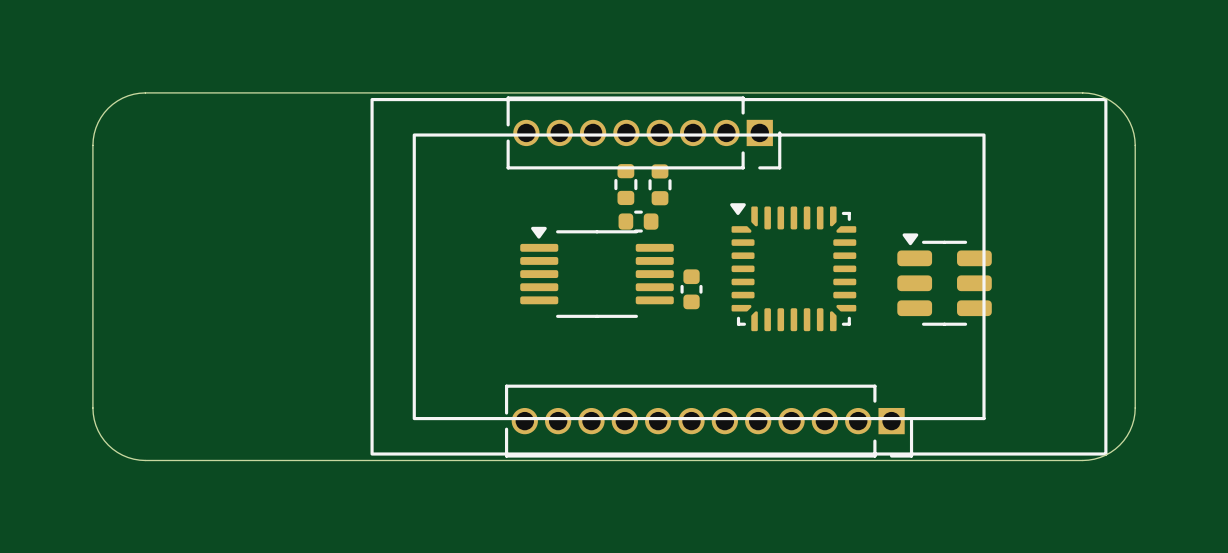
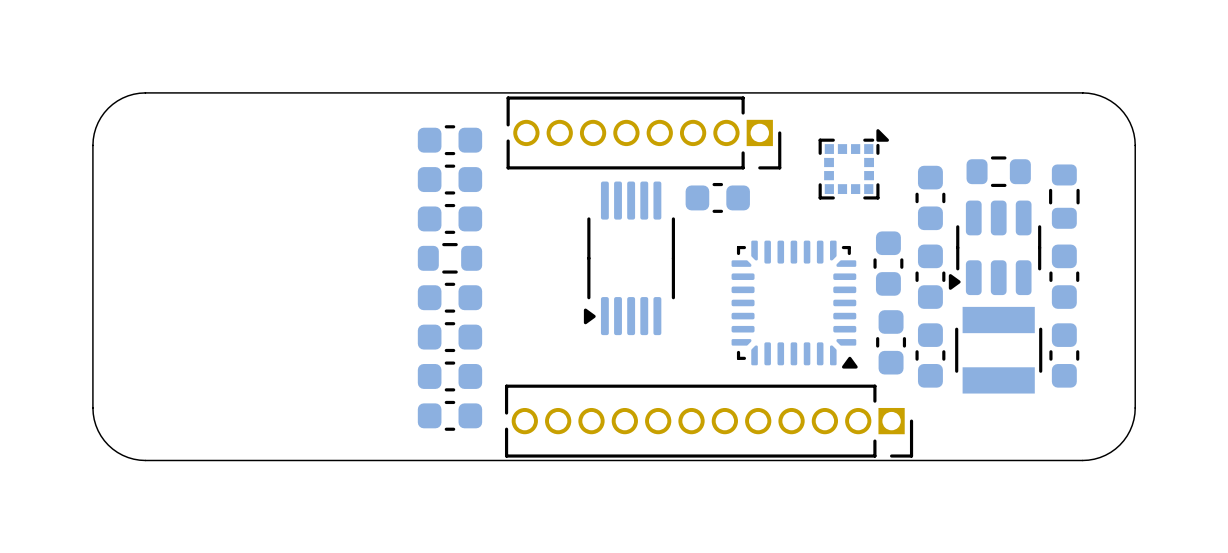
part: none -> (449, 140)
part: none -> (853, 164)
part: none -> (998, 171)
part: none -> (449, 179)
part: (625, 184) -> none
part: (660, 184) -> none
part: none -> (1064, 196)
part: none -> (717, 197)
part: none -> (930, 197)
part: none -> (449, 218)
part: (638, 221) -> none
part footprint: [897, 233, 992, 326] -> [915, 244, 946, 309]
part: none -> (995, 247)
part: none -> (449, 258)
part: none -> (888, 263)
part rotation: 0° (793, 267) -> 180° (794, 304)
part rotation: 0° (597, 272) -> 90° counterclockwise (629, 258)
part: (738, 276) -> none
part: none -> (1064, 276)
part: (691, 289) -> none
part: none -> (449, 297)
part: none -> (449, 337)
part: none -> (891, 342)
part: none -> (998, 350)
part: none -> (930, 355)
part: none -> (1064, 355)
part: none -> (449, 376)
part: none -> (449, 415)

